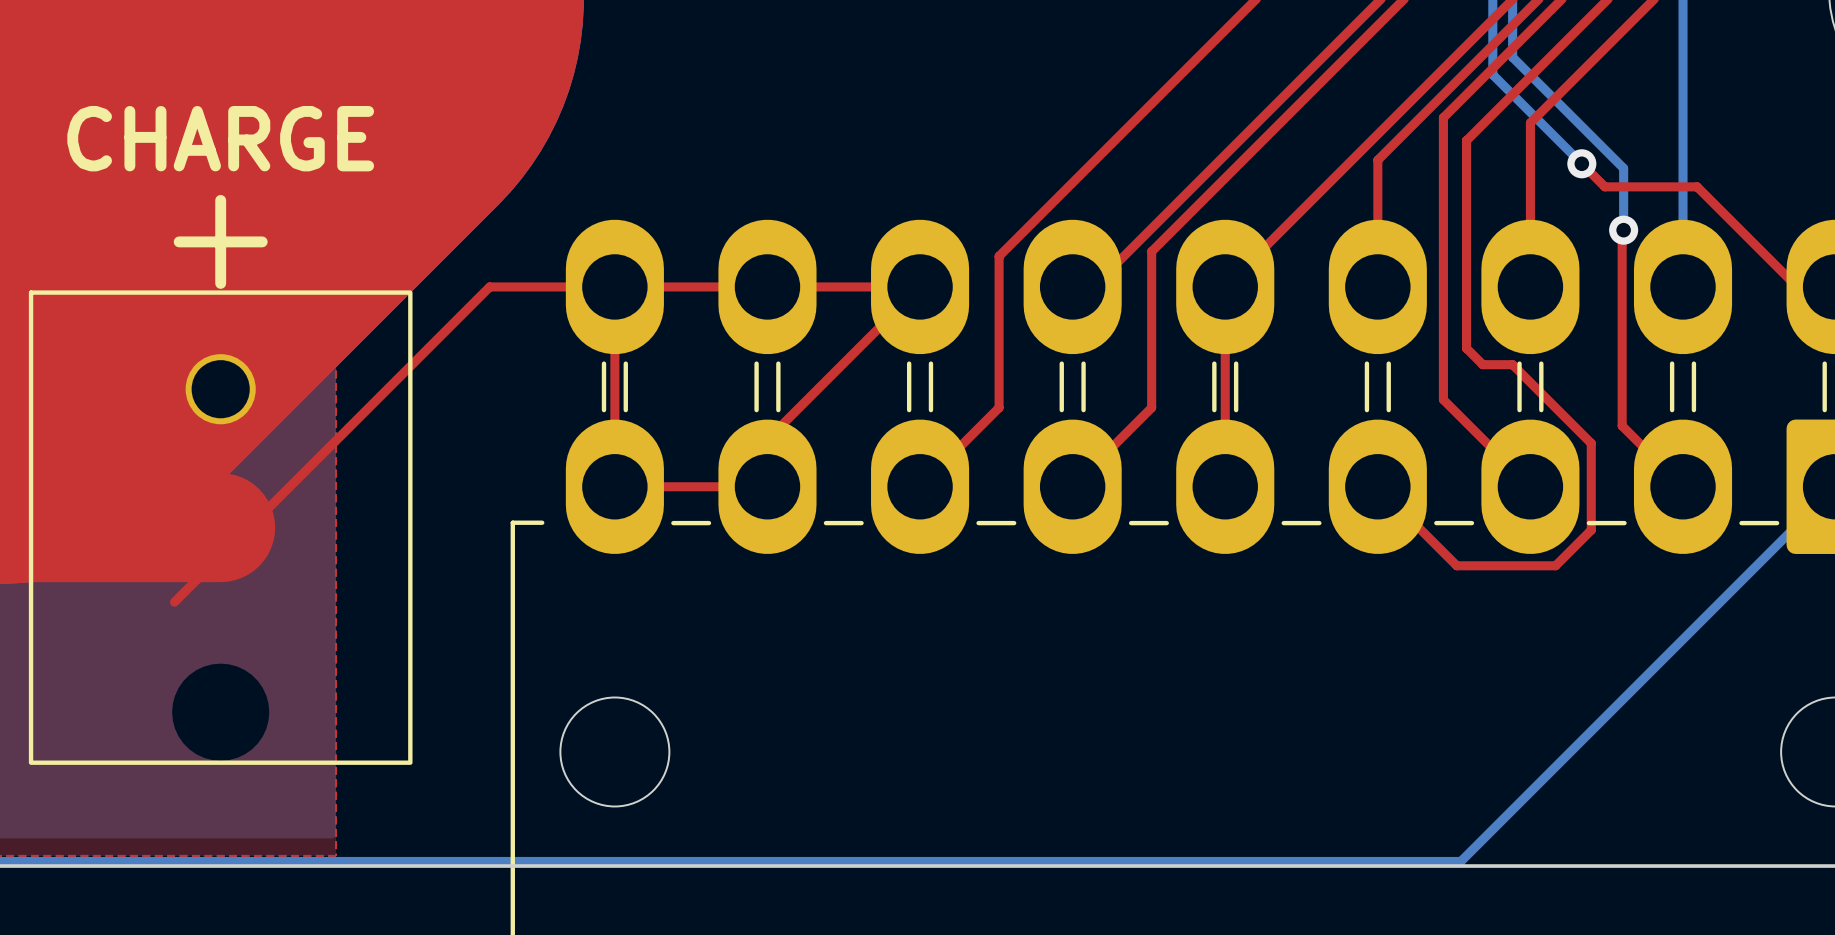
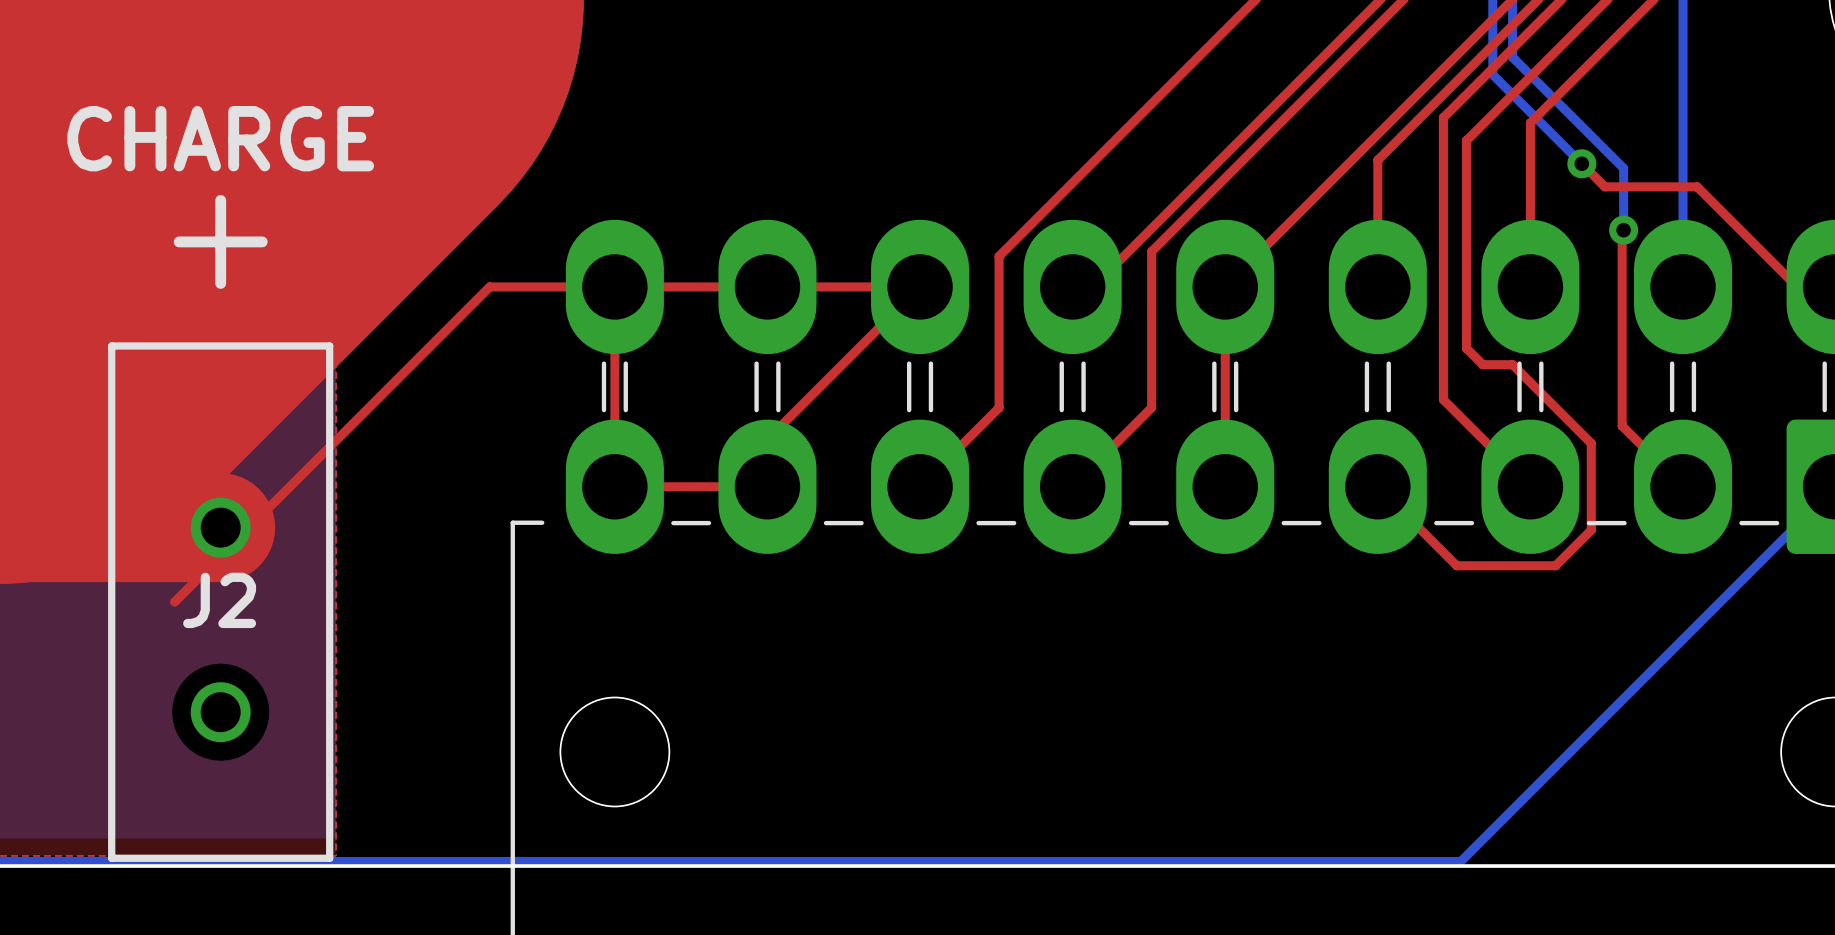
part: (220, 527) -> none
J2: none -> (220, 602)

